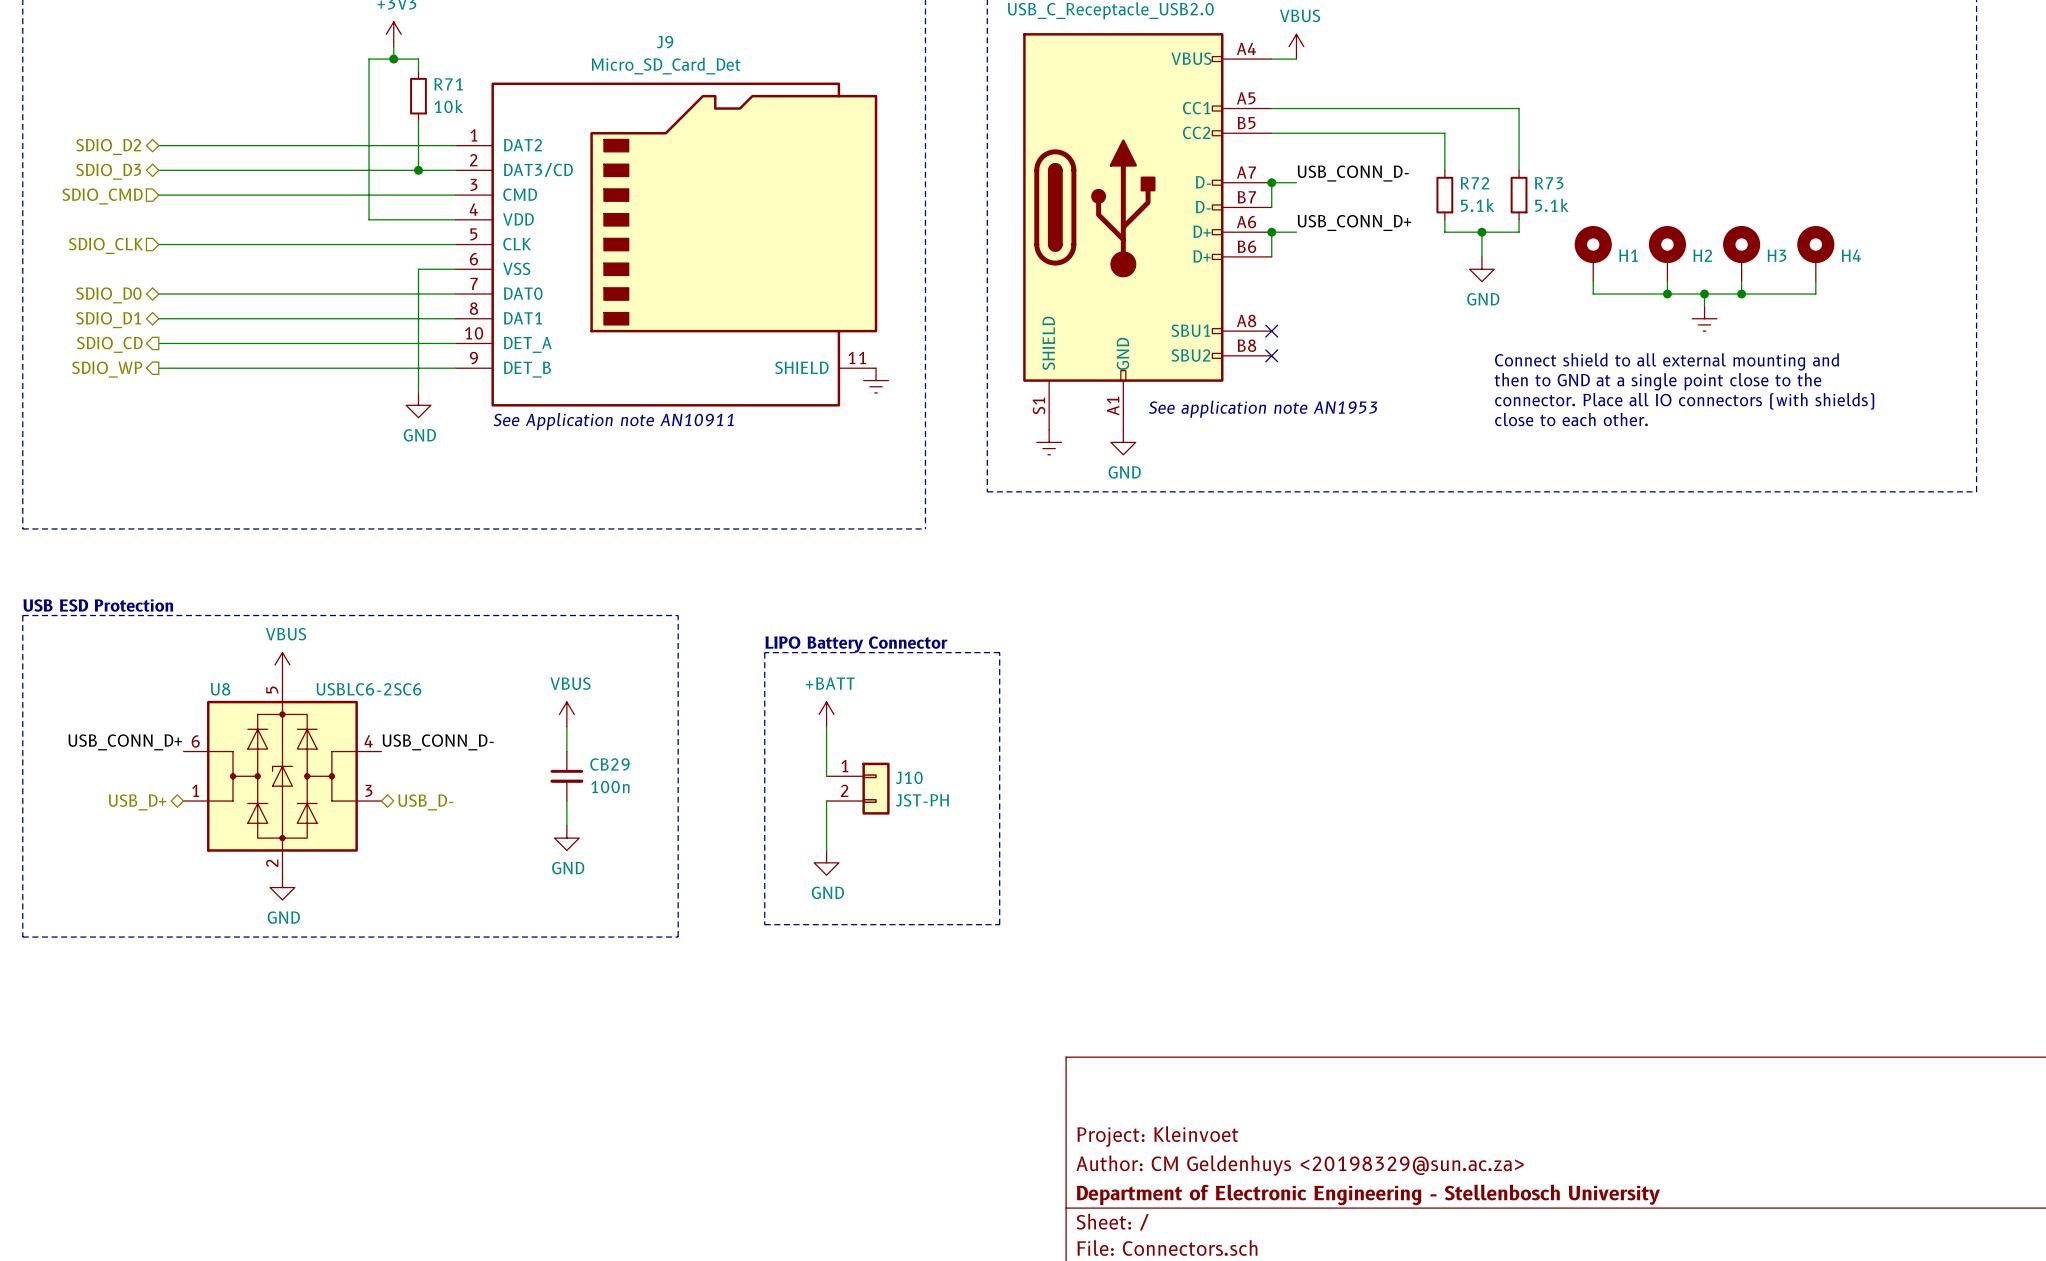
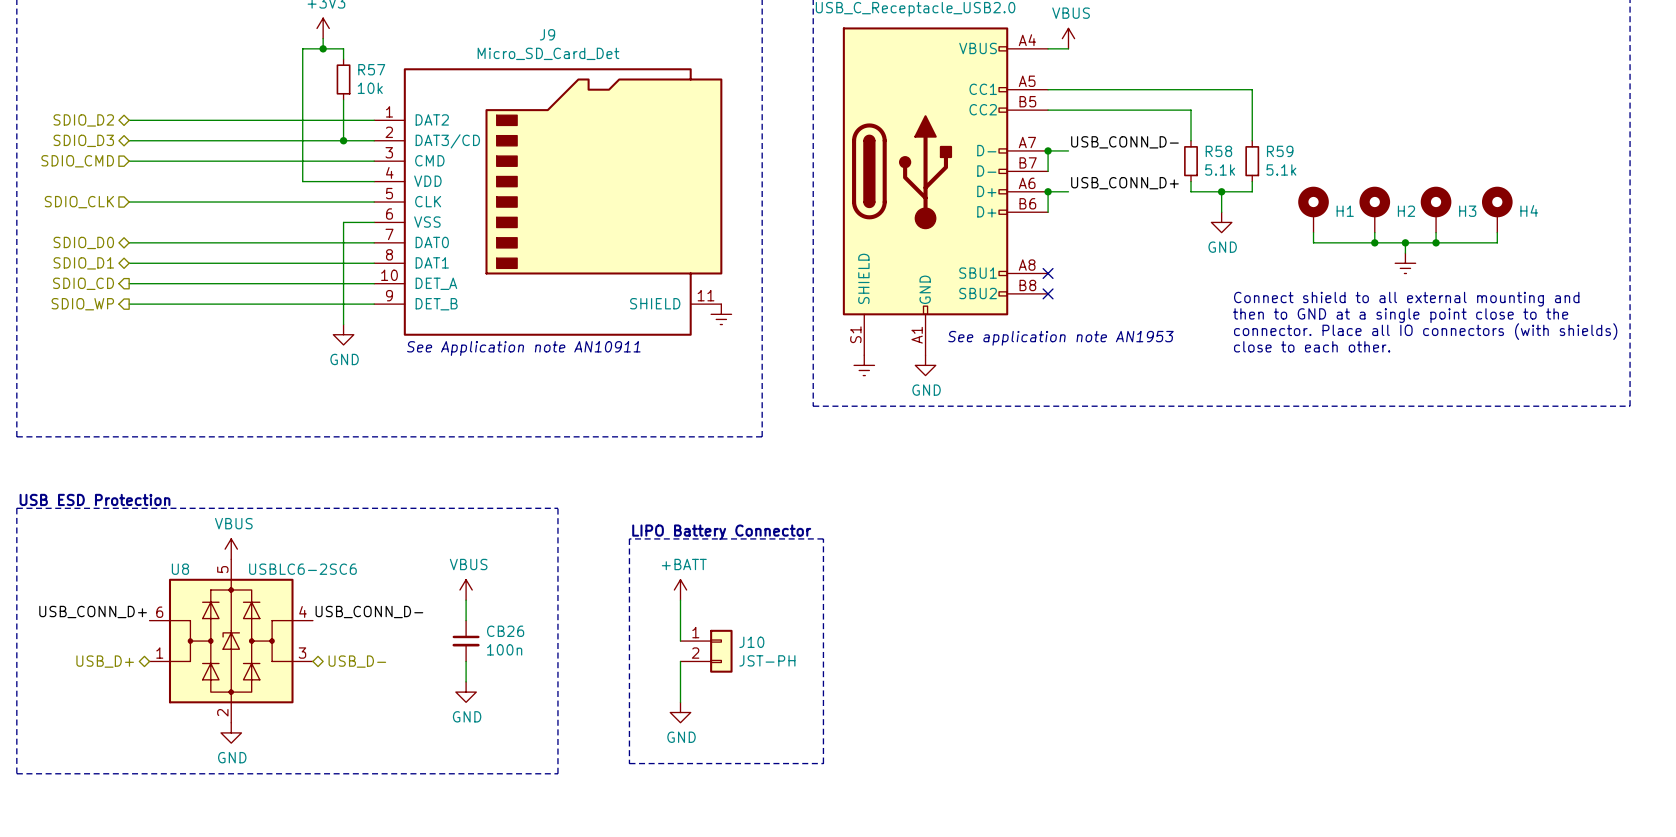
R71 name: R71 (448, 84) -> R57 (371, 69)
R72 name: R72 (1474, 183) -> R58 (1218, 151)
R73 name: R73 (1549, 183) -> R59 (1280, 151)
CB29 name: CB29 (610, 764) -> CB26 (505, 631)

